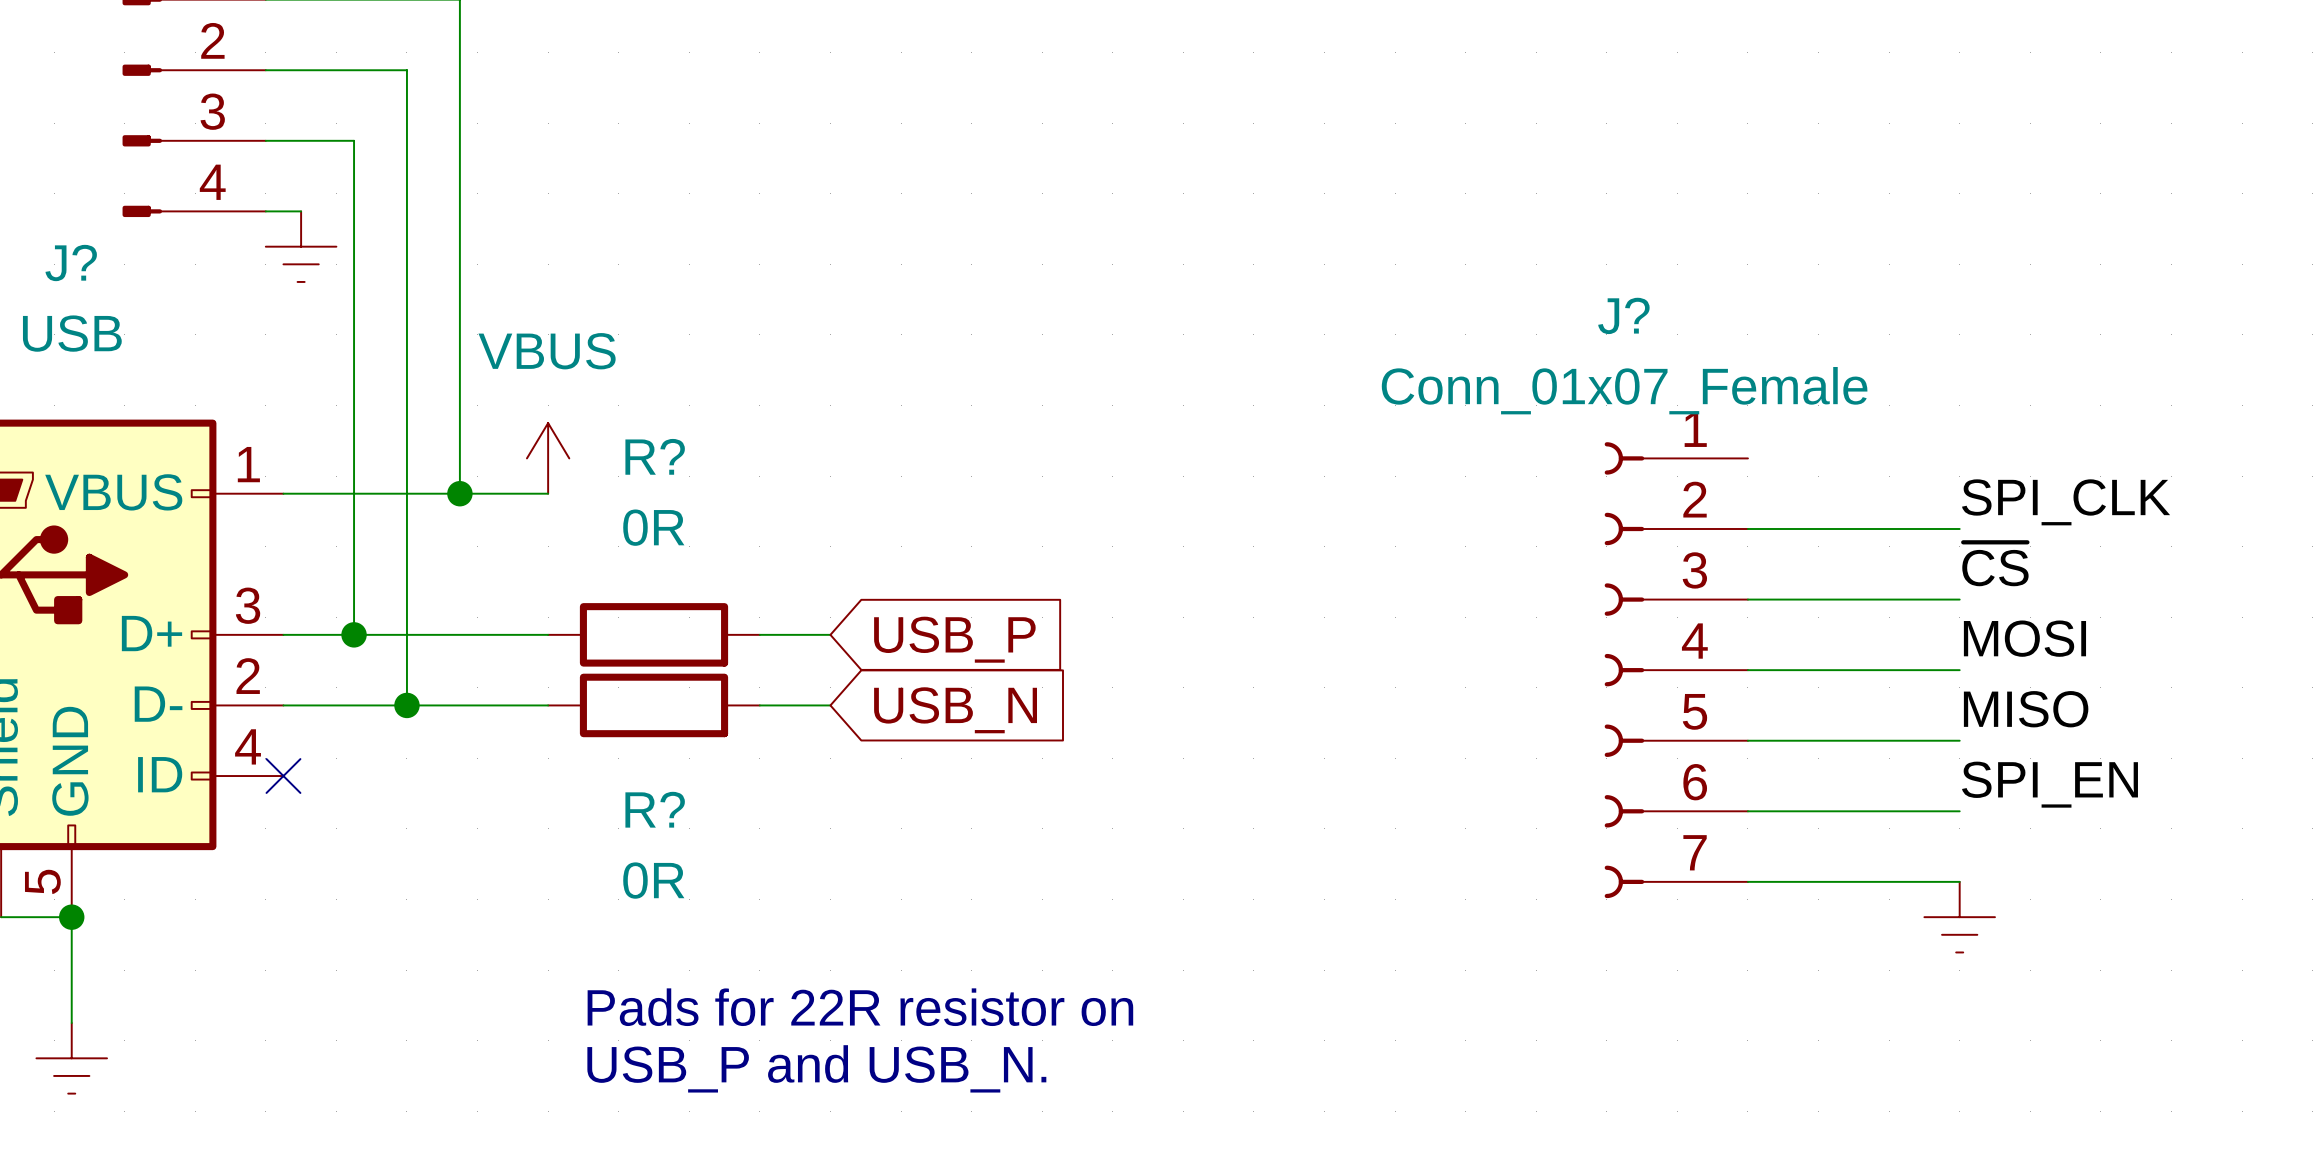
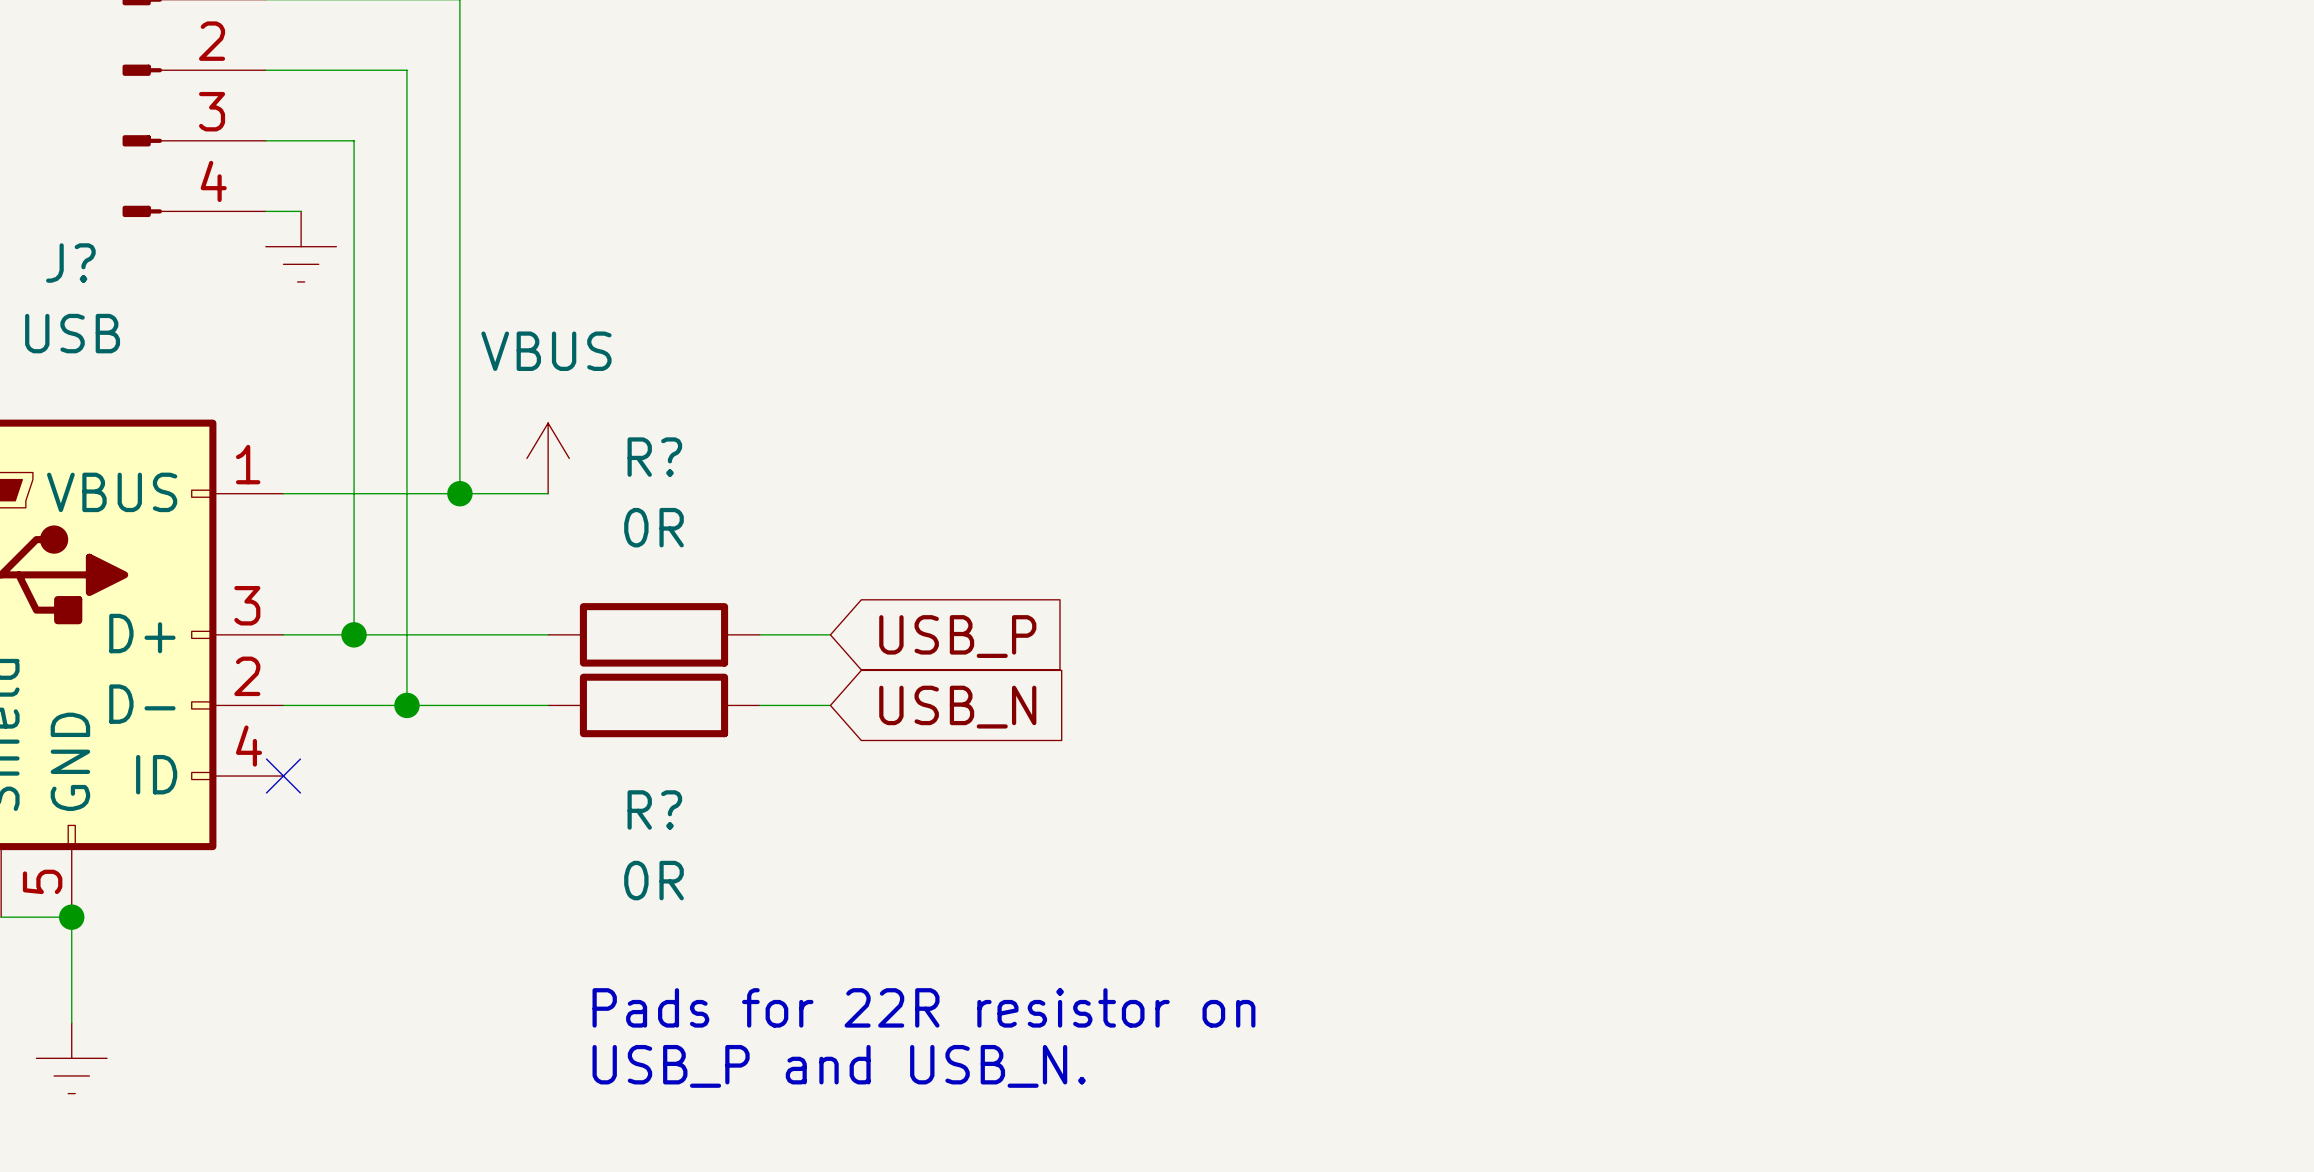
label: SPI_CLK (2066, 502) -> none
wire: (1747, 528) (1959, 528) -> none
label: ~{CS} (1995, 564) -> none
wire: (1747, 599) (1959, 599) -> none
label: MOSI (2024, 638) -> none
J?: Conn_01x07_Female (1676, 670) -> none
wire: (1747, 670) (1959, 670) -> none
label: MISO (2026, 709) -> none
wire: (1747, 740) (1959, 740) -> none
label: SPI_EN (2049, 784) -> none
wire: (1747, 811) (1959, 811) -> none
wire: (1747, 881) (1959, 881) -> none
power symbol: (1959, 917) -> none

